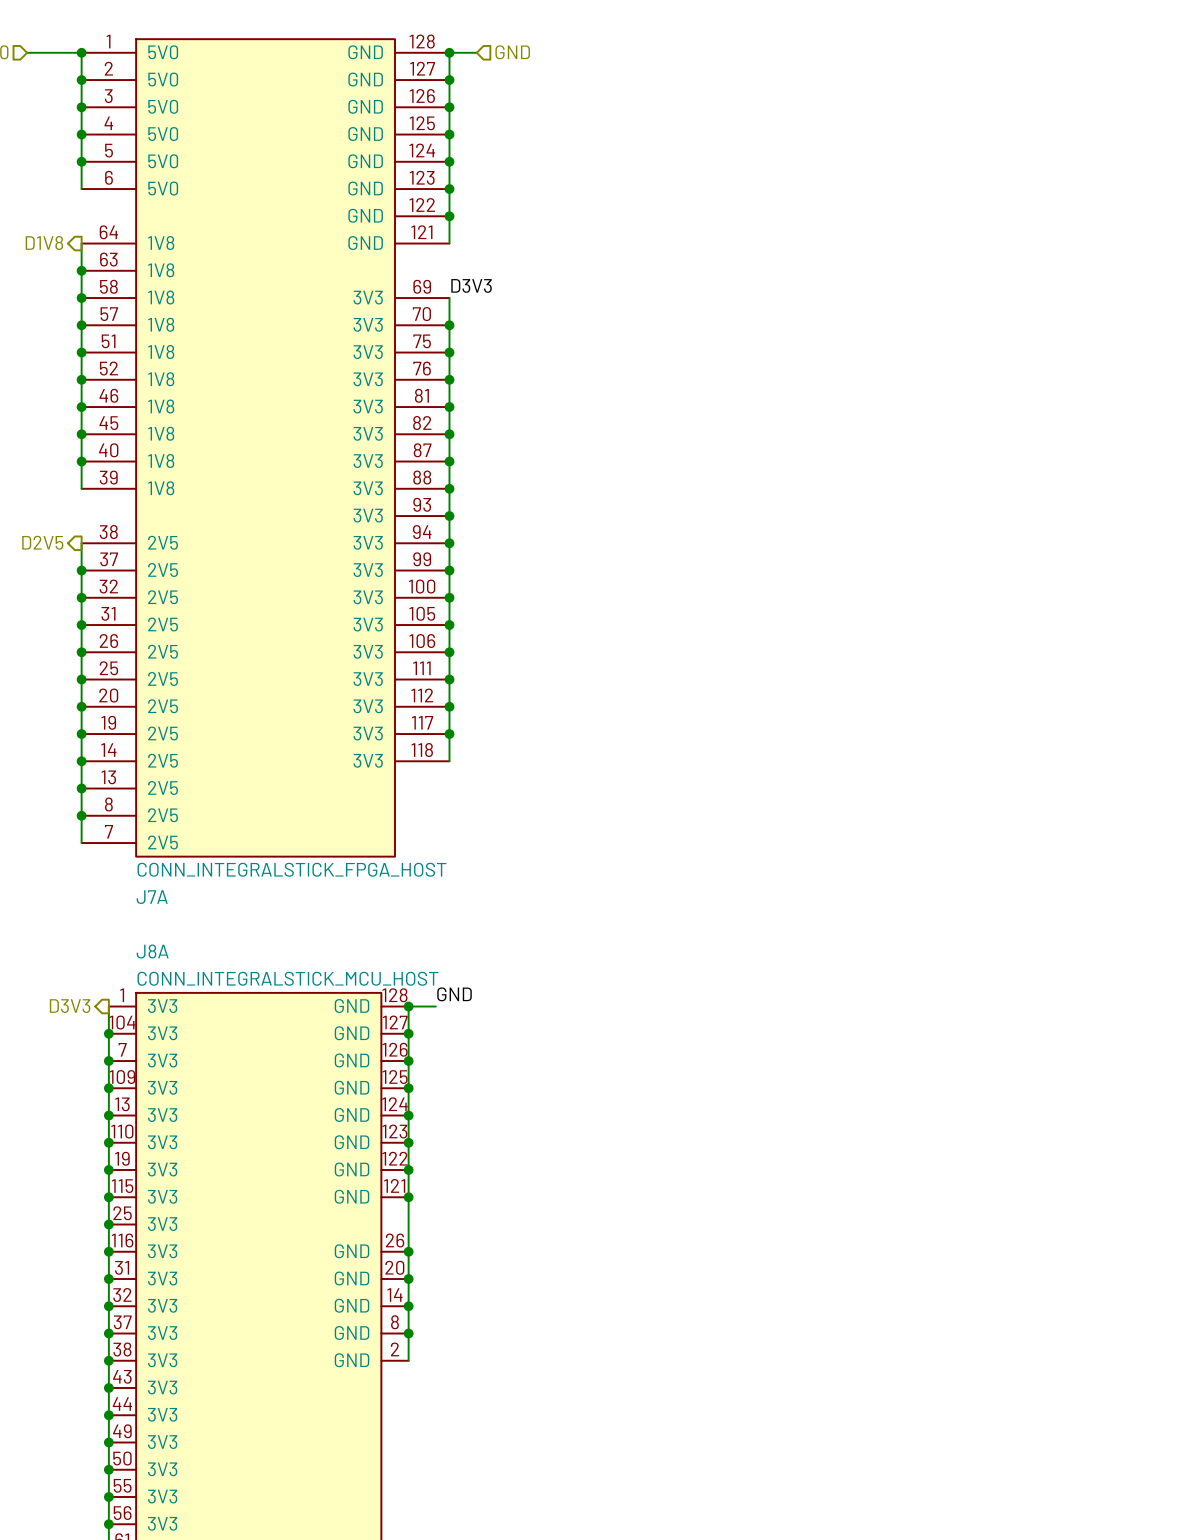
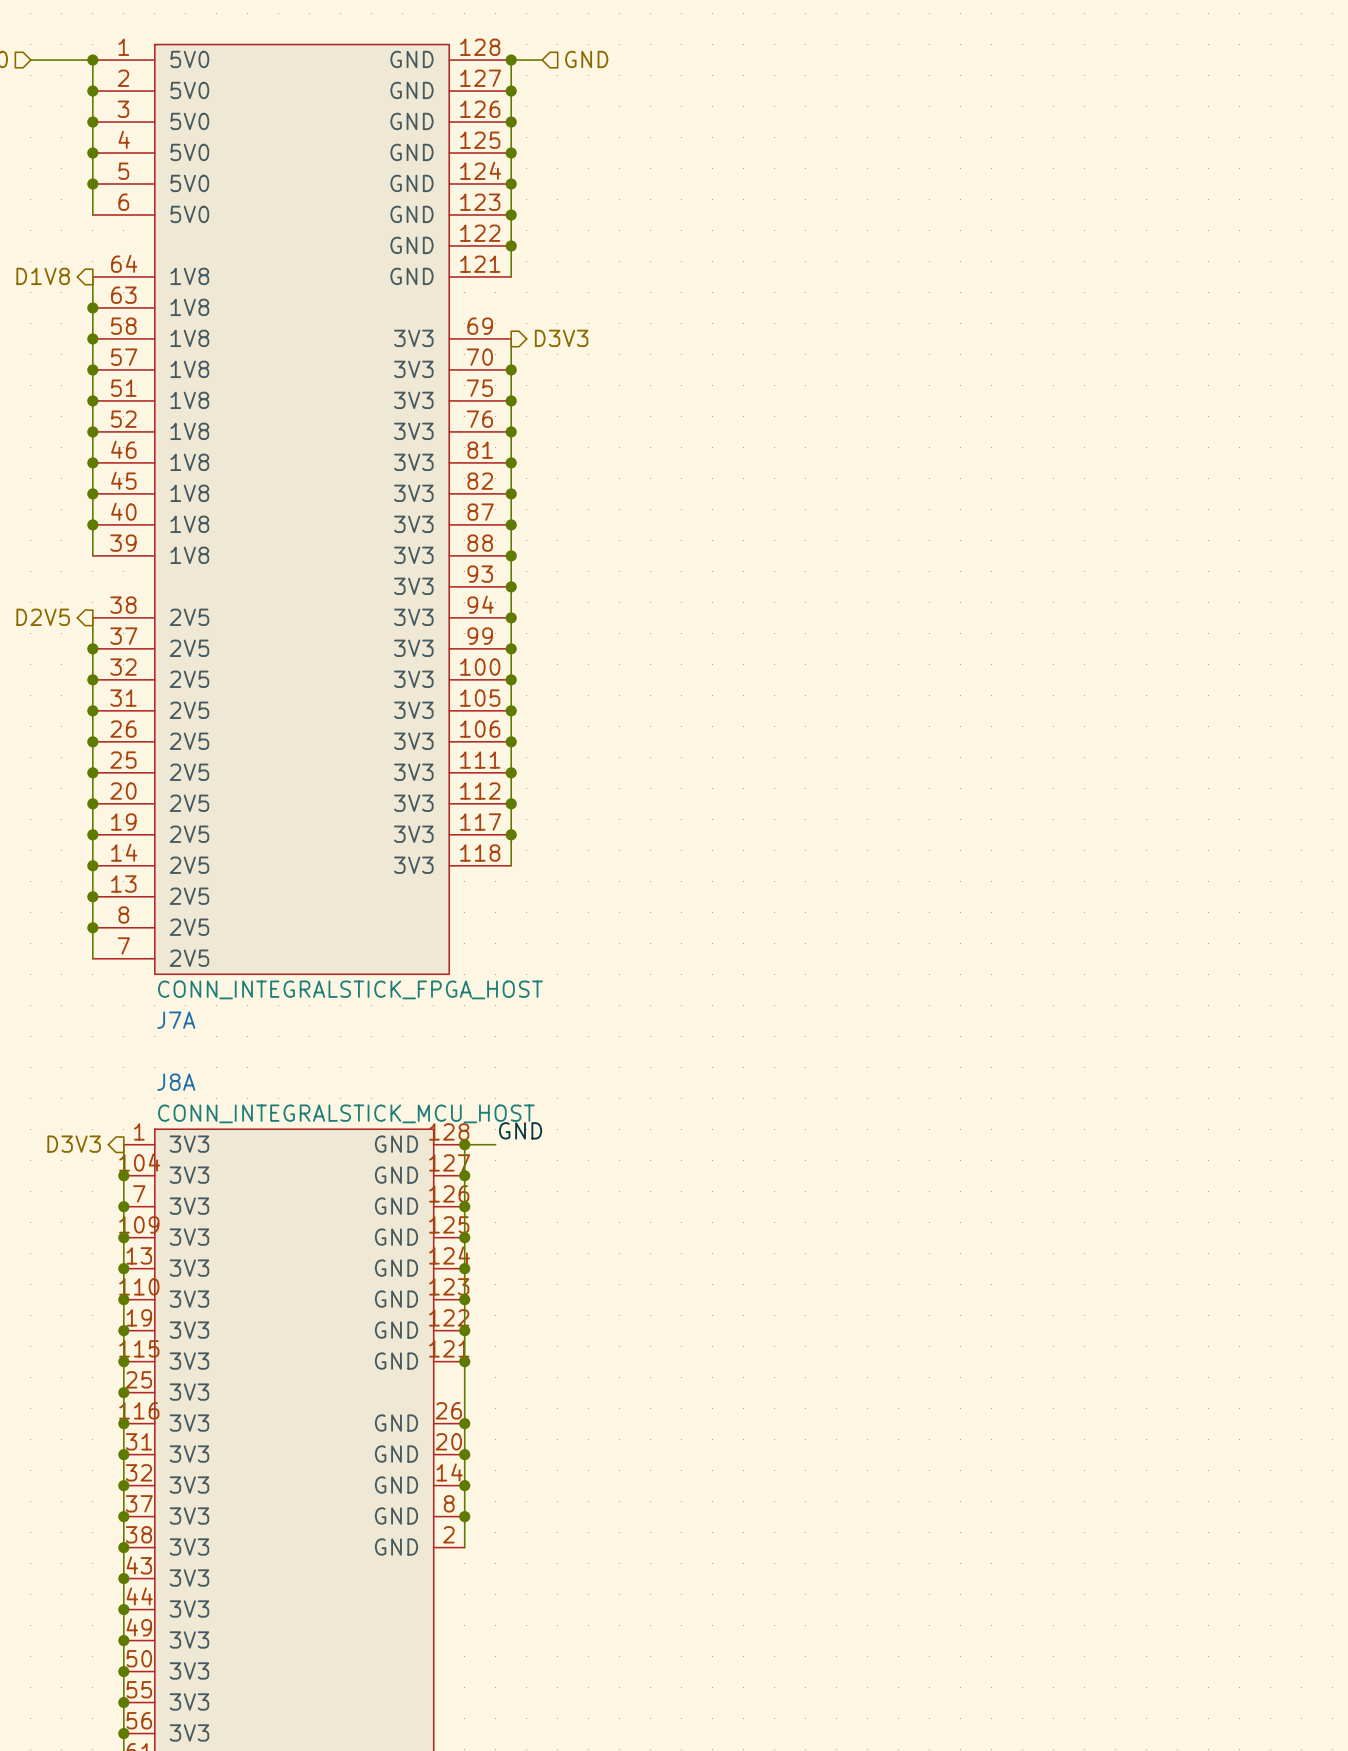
label: D3V3 (471, 285) -> none
hierarchical label: none -> D3V3 (561, 338)

